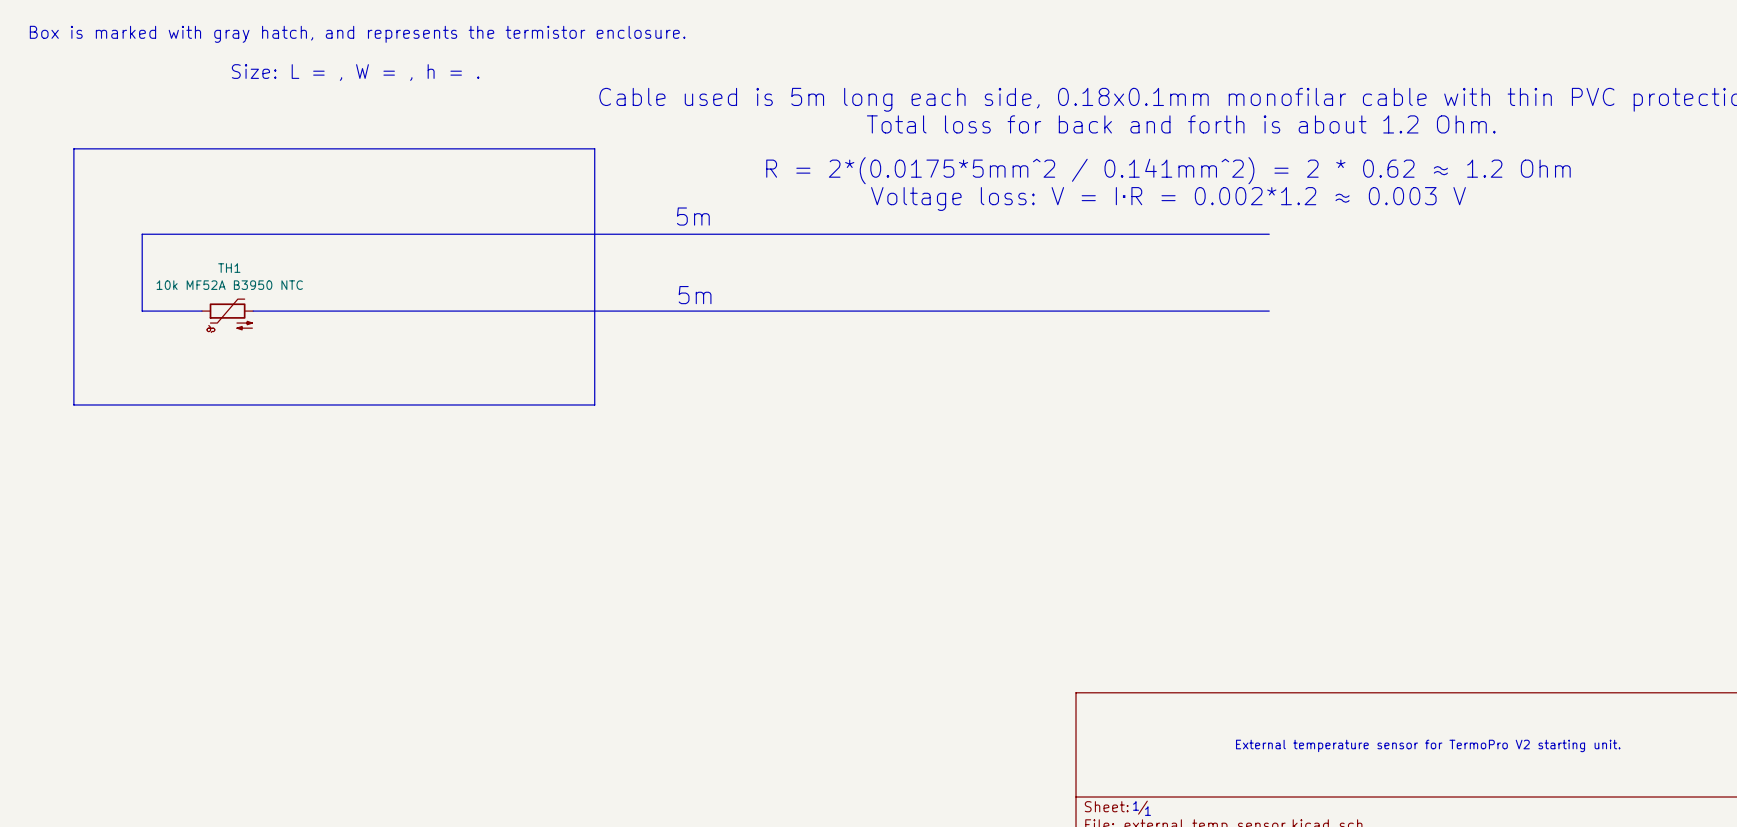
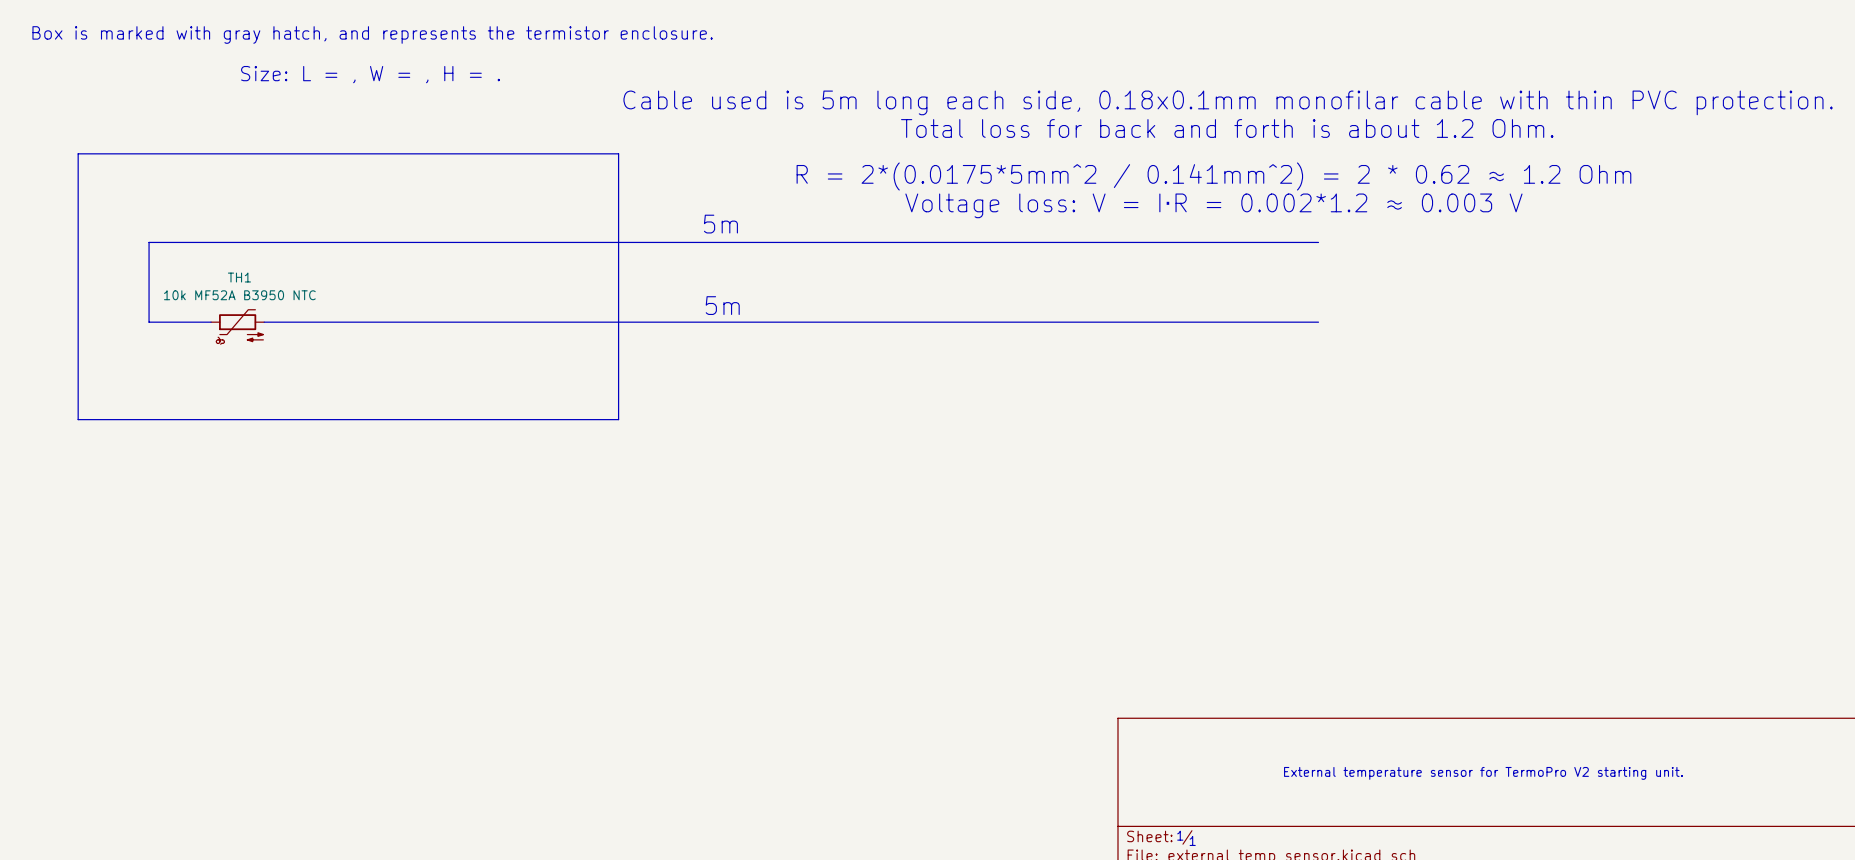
text: Size: L = , W = , h = . (355, 72) -> Size: L = , W = , H = . (370, 74)

